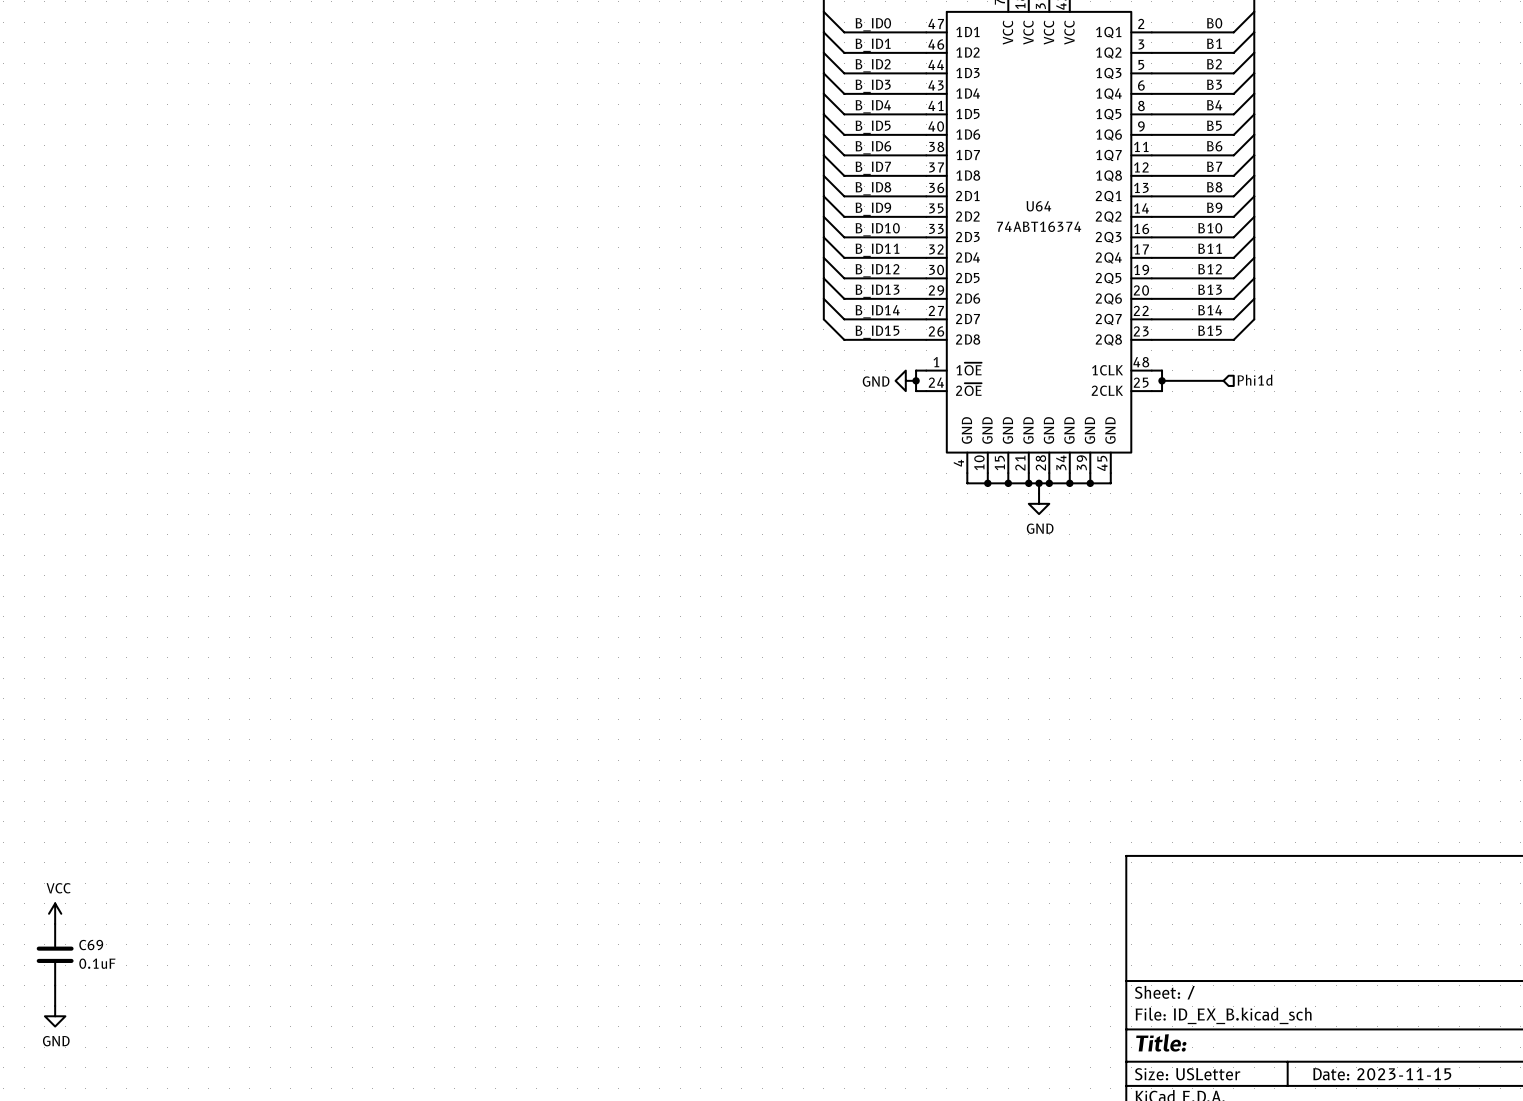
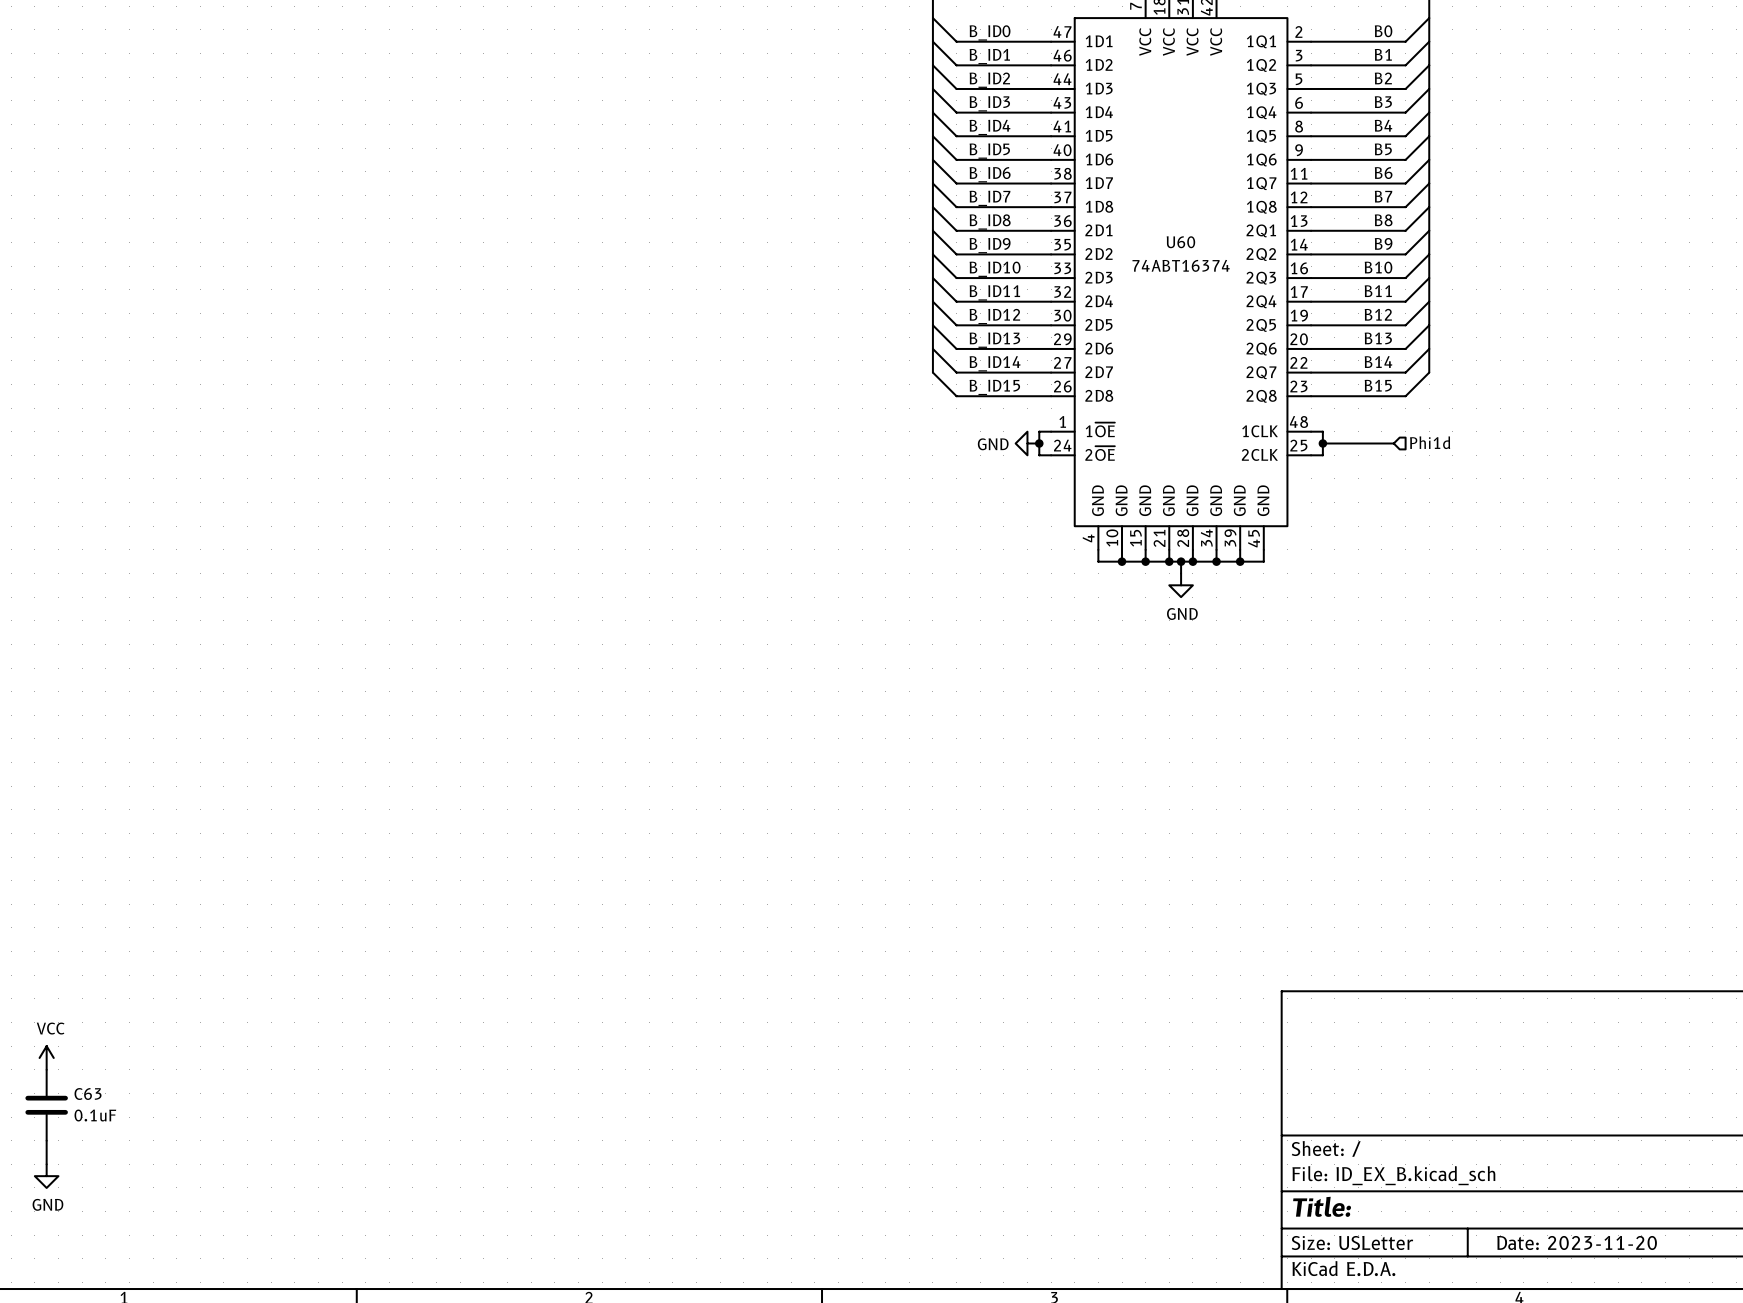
U64 name: U64 (1038, 206) -> U60 (1180, 242)
C69 name: C69 (91, 945) -> C63 (88, 1094)
title block: Date: 2023-11-15 (1382, 1074) -> Date: 2023-11-20 (1577, 1242)

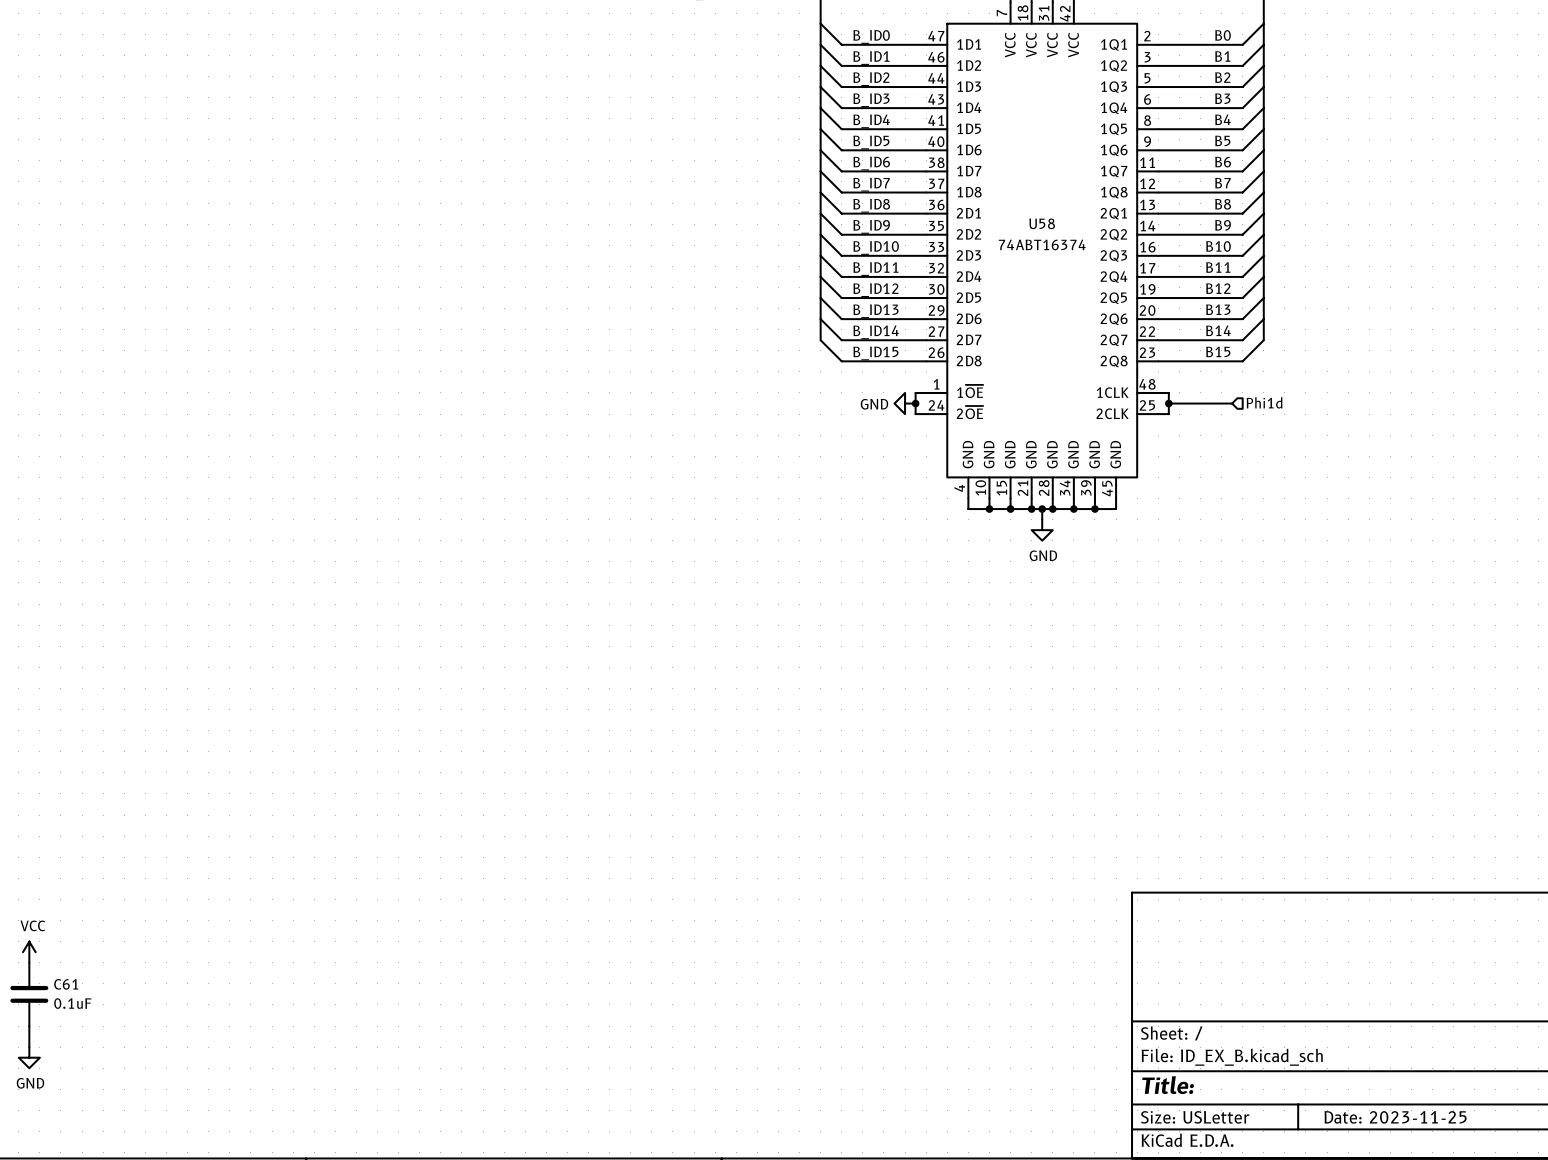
U60 name: U60 (1180, 242) -> U58 (1042, 223)
C63 name: C63 (88, 1094) -> C61 (66, 984)
title block: Date: 2023-11-20 (1577, 1242) -> Date: 2023-11-25 (1395, 1117)

